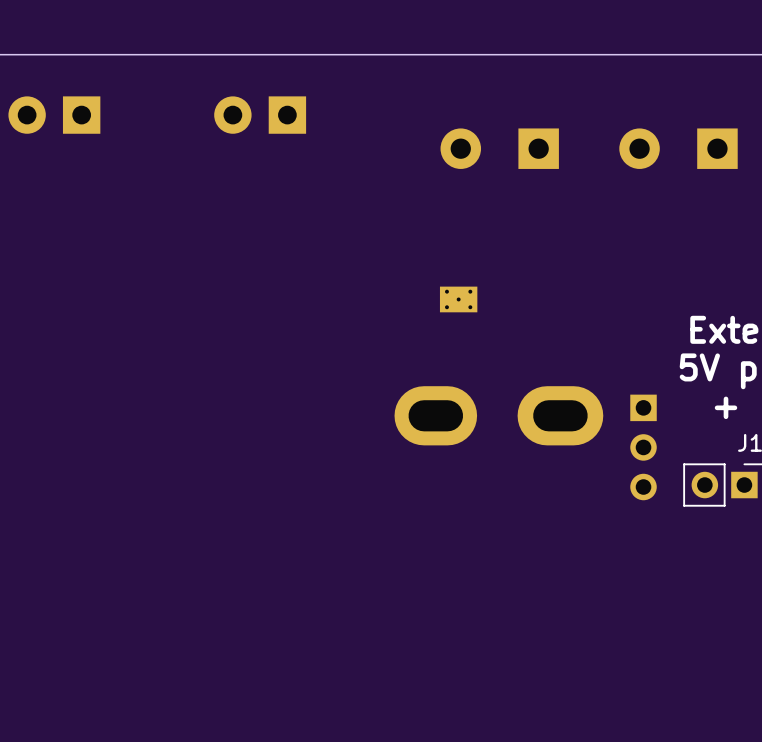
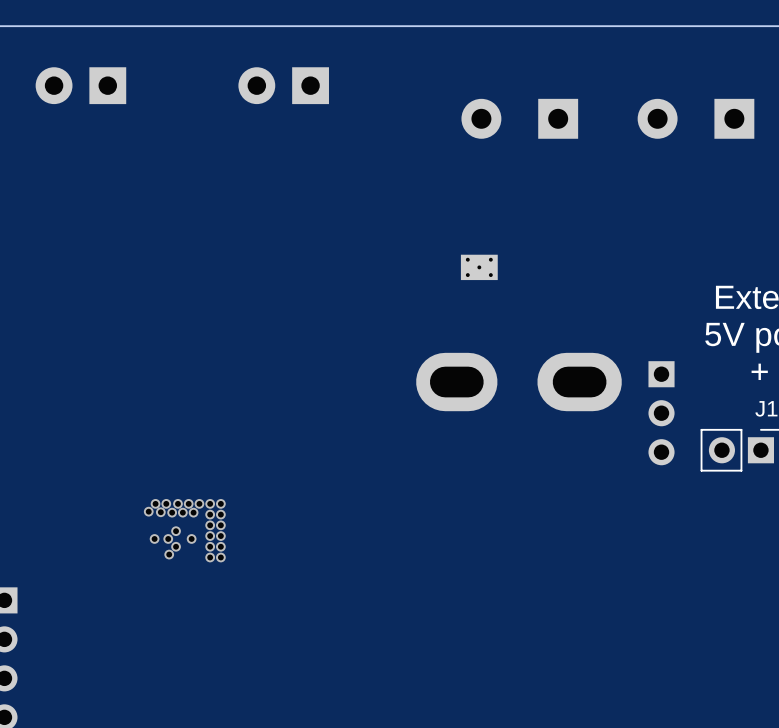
via: none -> (155, 503)
via: none -> (166, 503)
via: none -> (177, 503)
via: none -> (188, 503)
via: none -> (199, 503)
via: none -> (210, 503)
via: none -> (220, 503)
via: none -> (148, 511)
via: none -> (160, 512)
via: none -> (172, 512)
via: none -> (182, 512)
via: none -> (193, 512)
via: none -> (210, 514)
via: none -> (220, 514)
via: none -> (210, 525)
via: none -> (220, 525)
via: none -> (176, 531)
via: none -> (210, 536)
via: none -> (220, 536)
via: none -> (154, 538)
via: none -> (168, 538)
via: none -> (191, 538)
via: none -> (176, 546)
via: none -> (210, 546)
via: none -> (220, 546)
via: none -> (169, 554)
via: none -> (210, 557)
via: none -> (220, 557)

